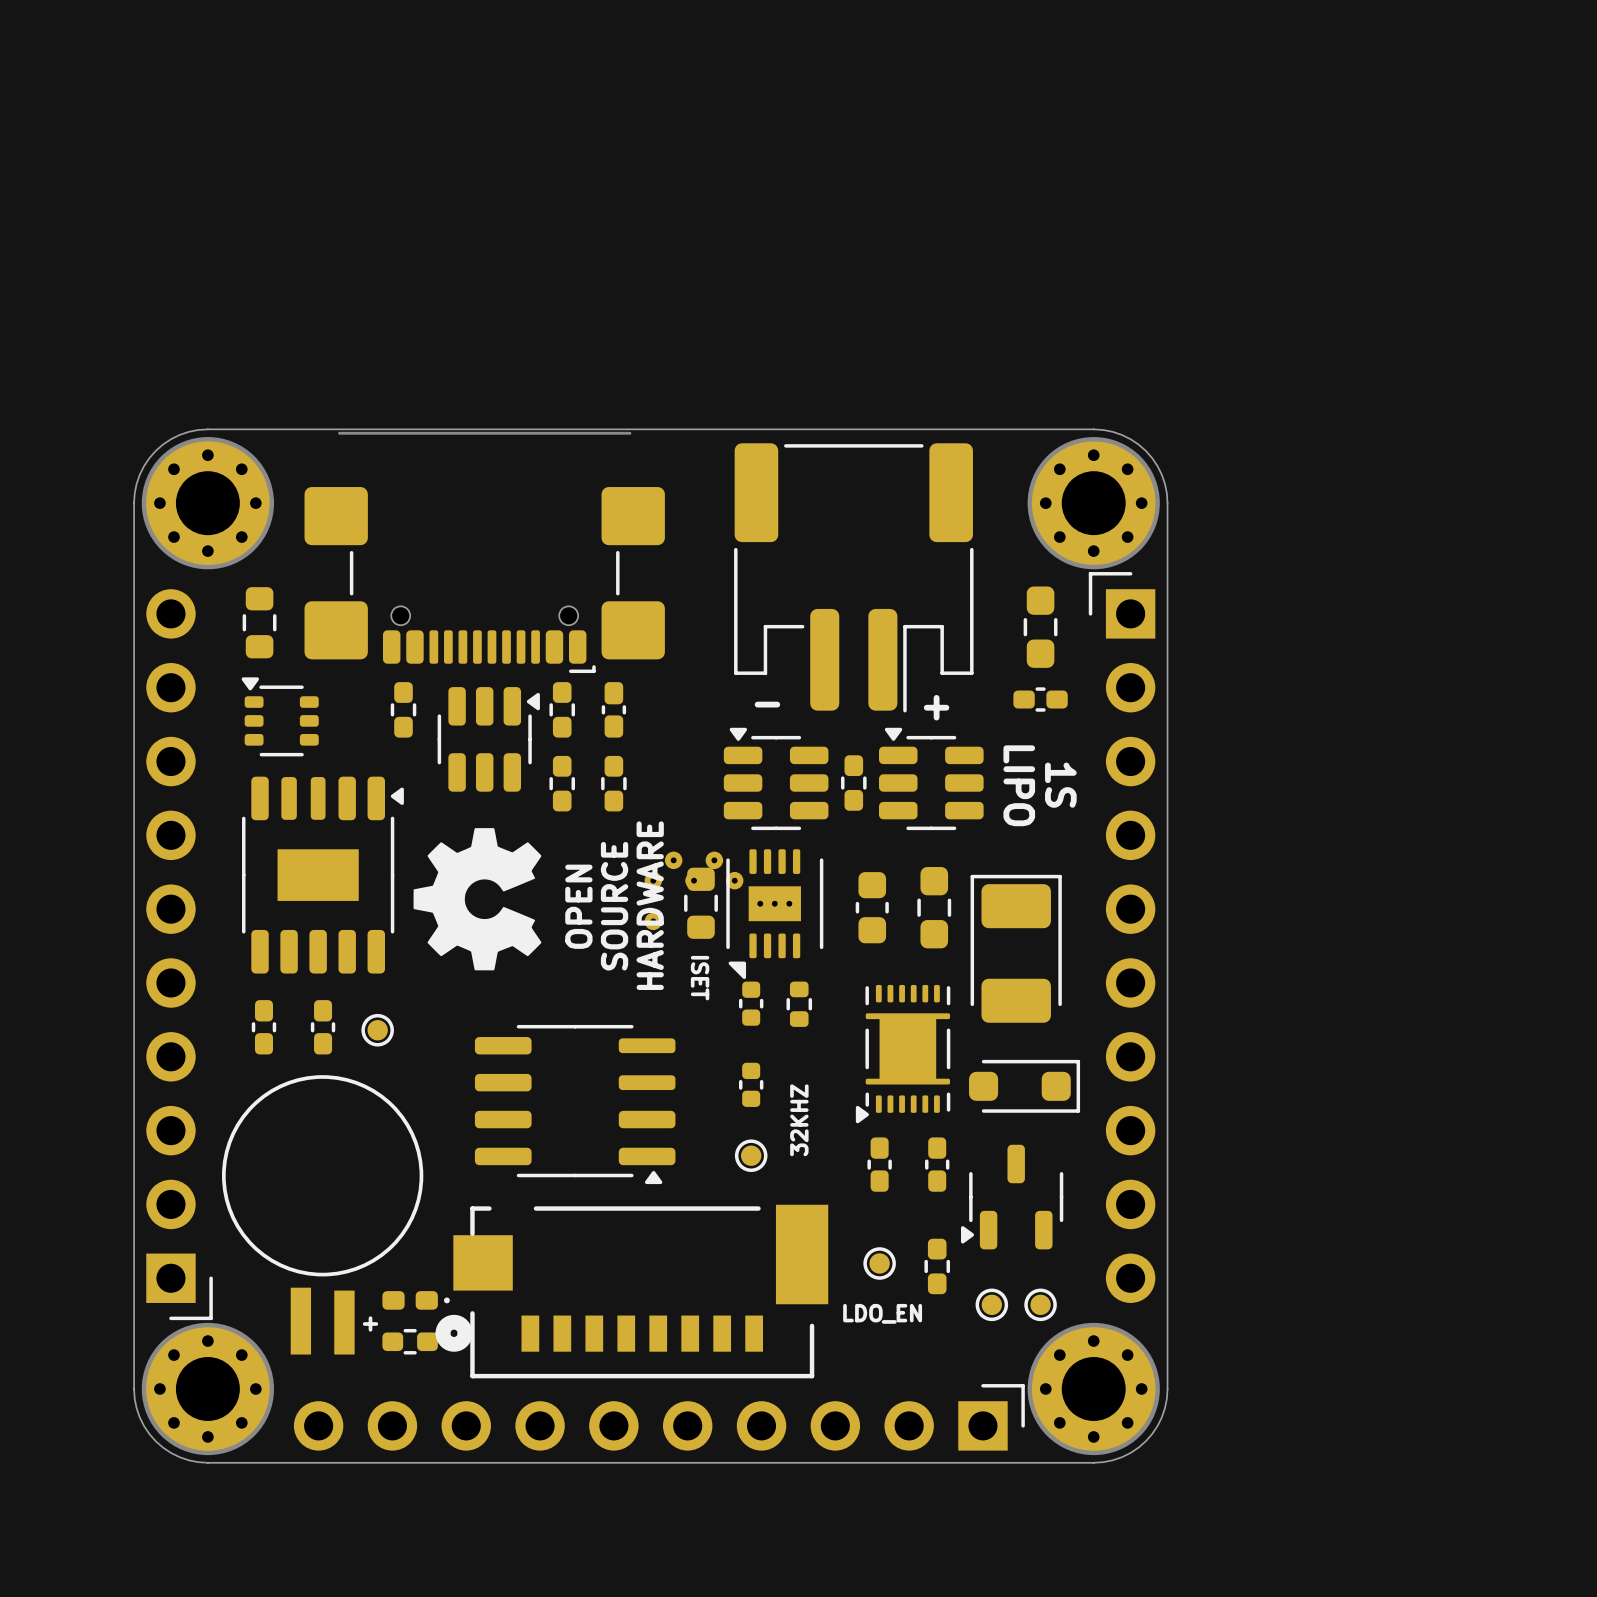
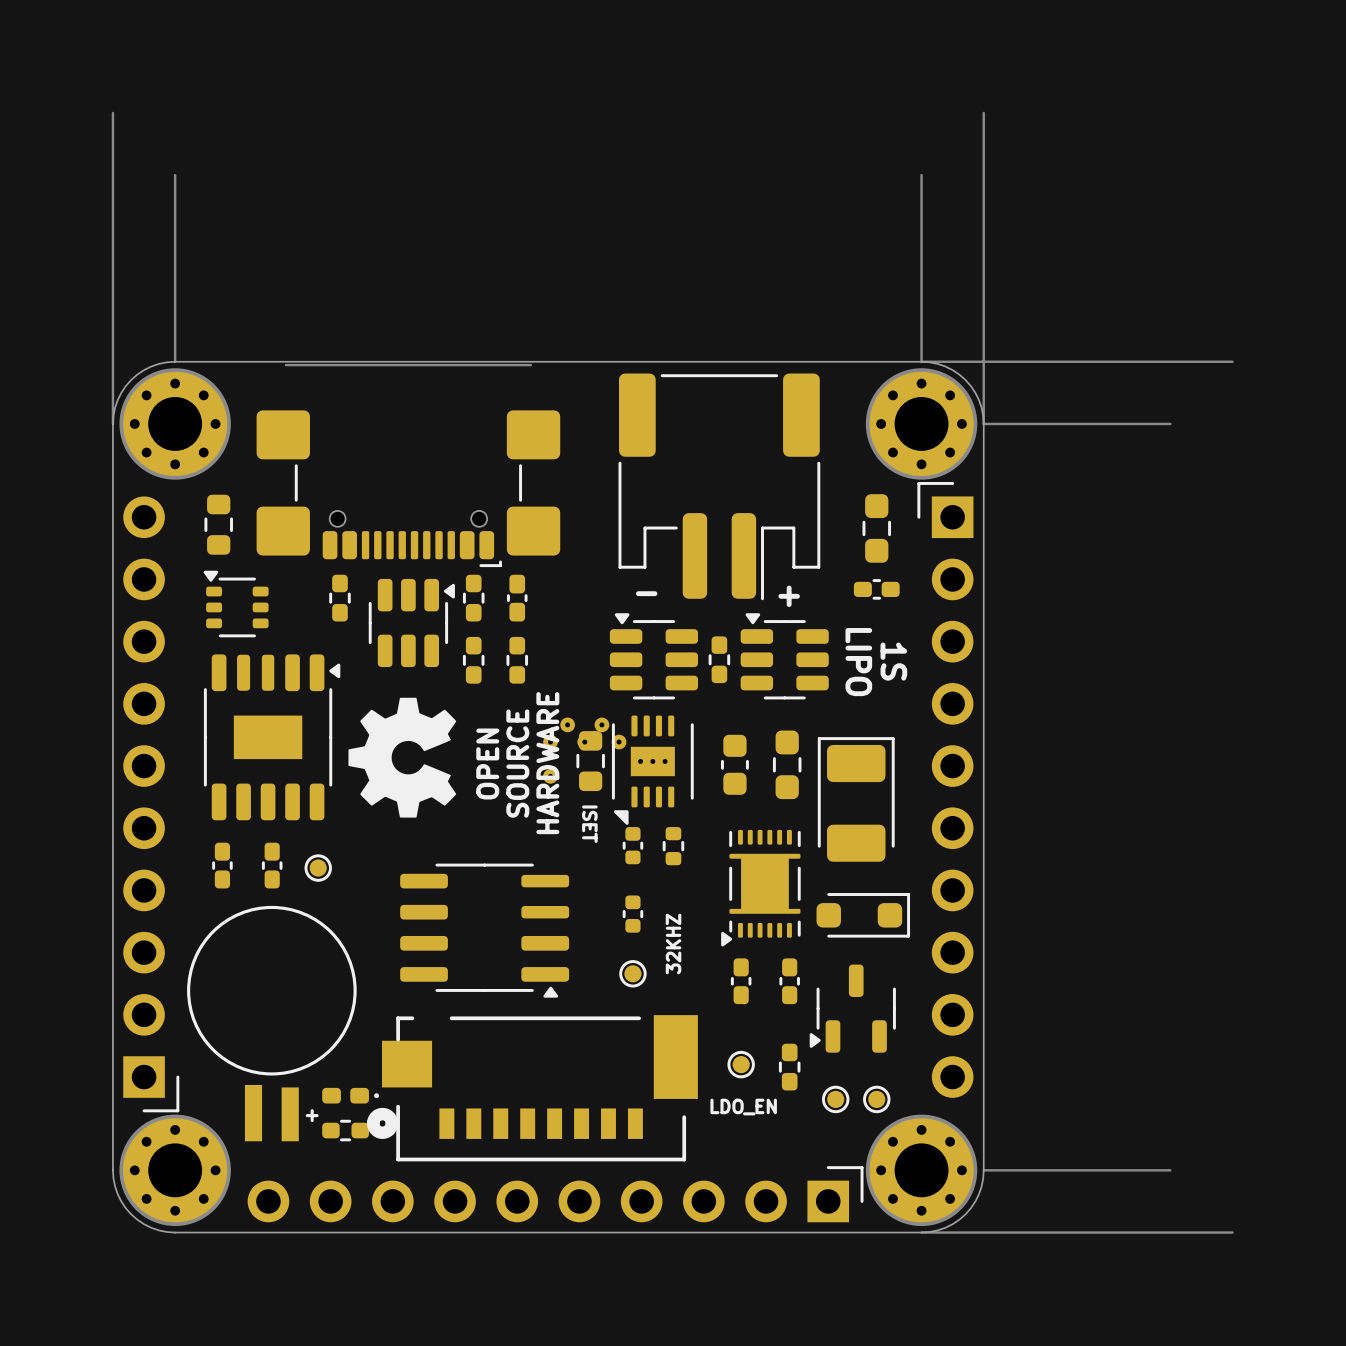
line: none -> (112, 112) (112, 423)
line: none -> (983, 112) (983, 423) (1170, 423)
line: none -> (175, 175) (175, 361)
line: none -> (921, 175) (921, 361) (1232, 361)
line: none -> (983, 1170) (1170, 1170)
line: none -> (921, 1232) (1232, 1232)

